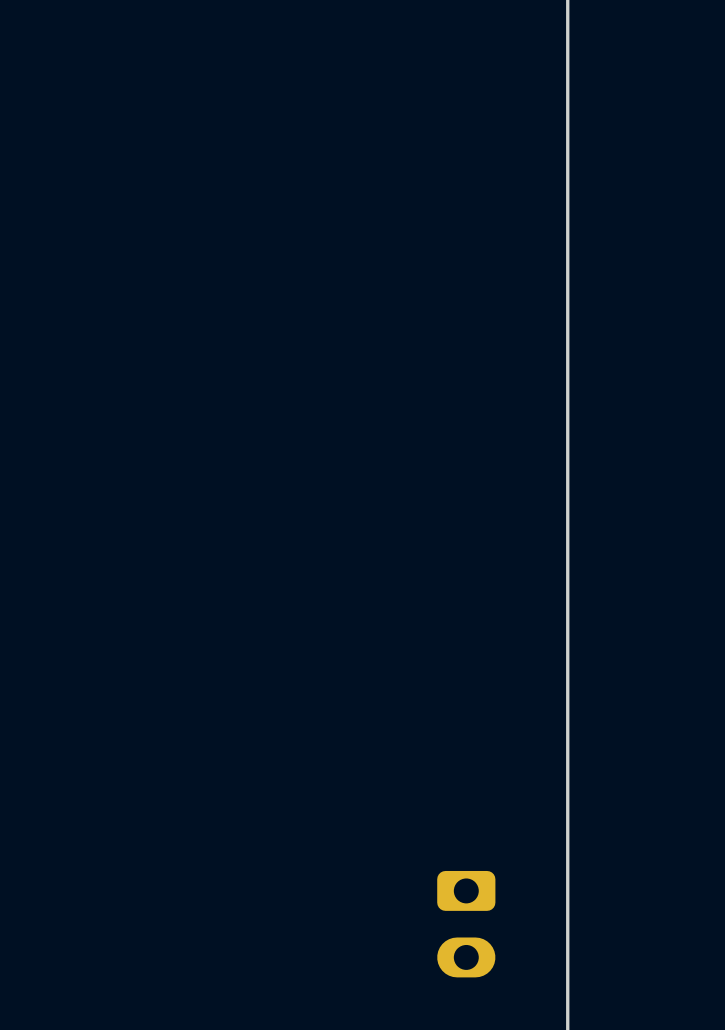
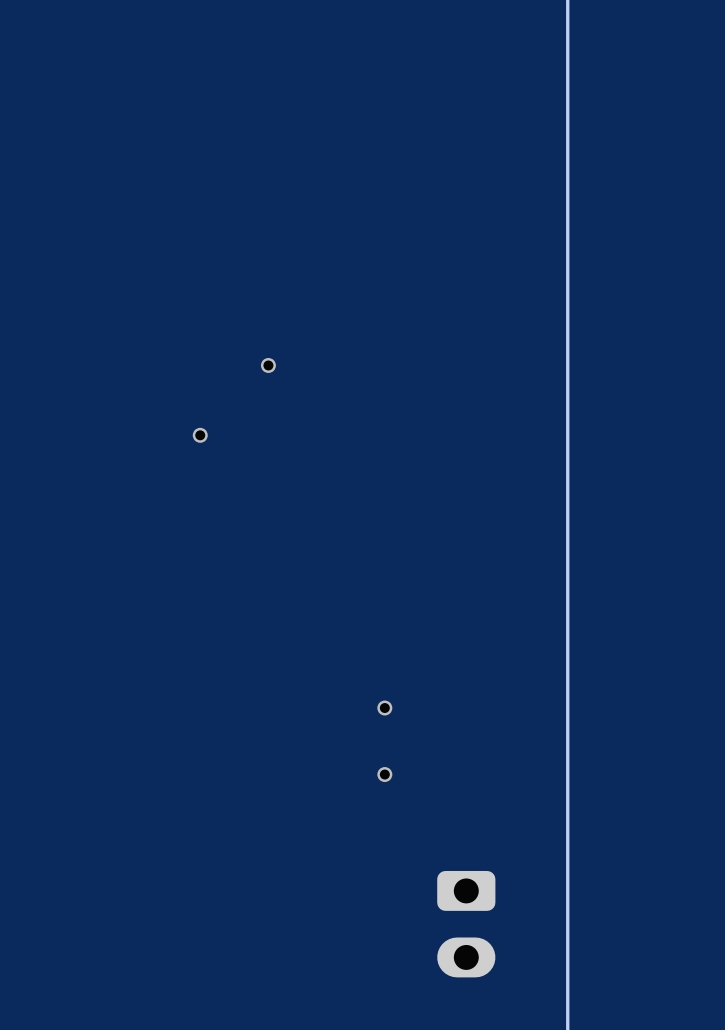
via: none -> (268, 365)
via: none -> (200, 435)
via: none -> (384, 708)
via: none -> (384, 774)

